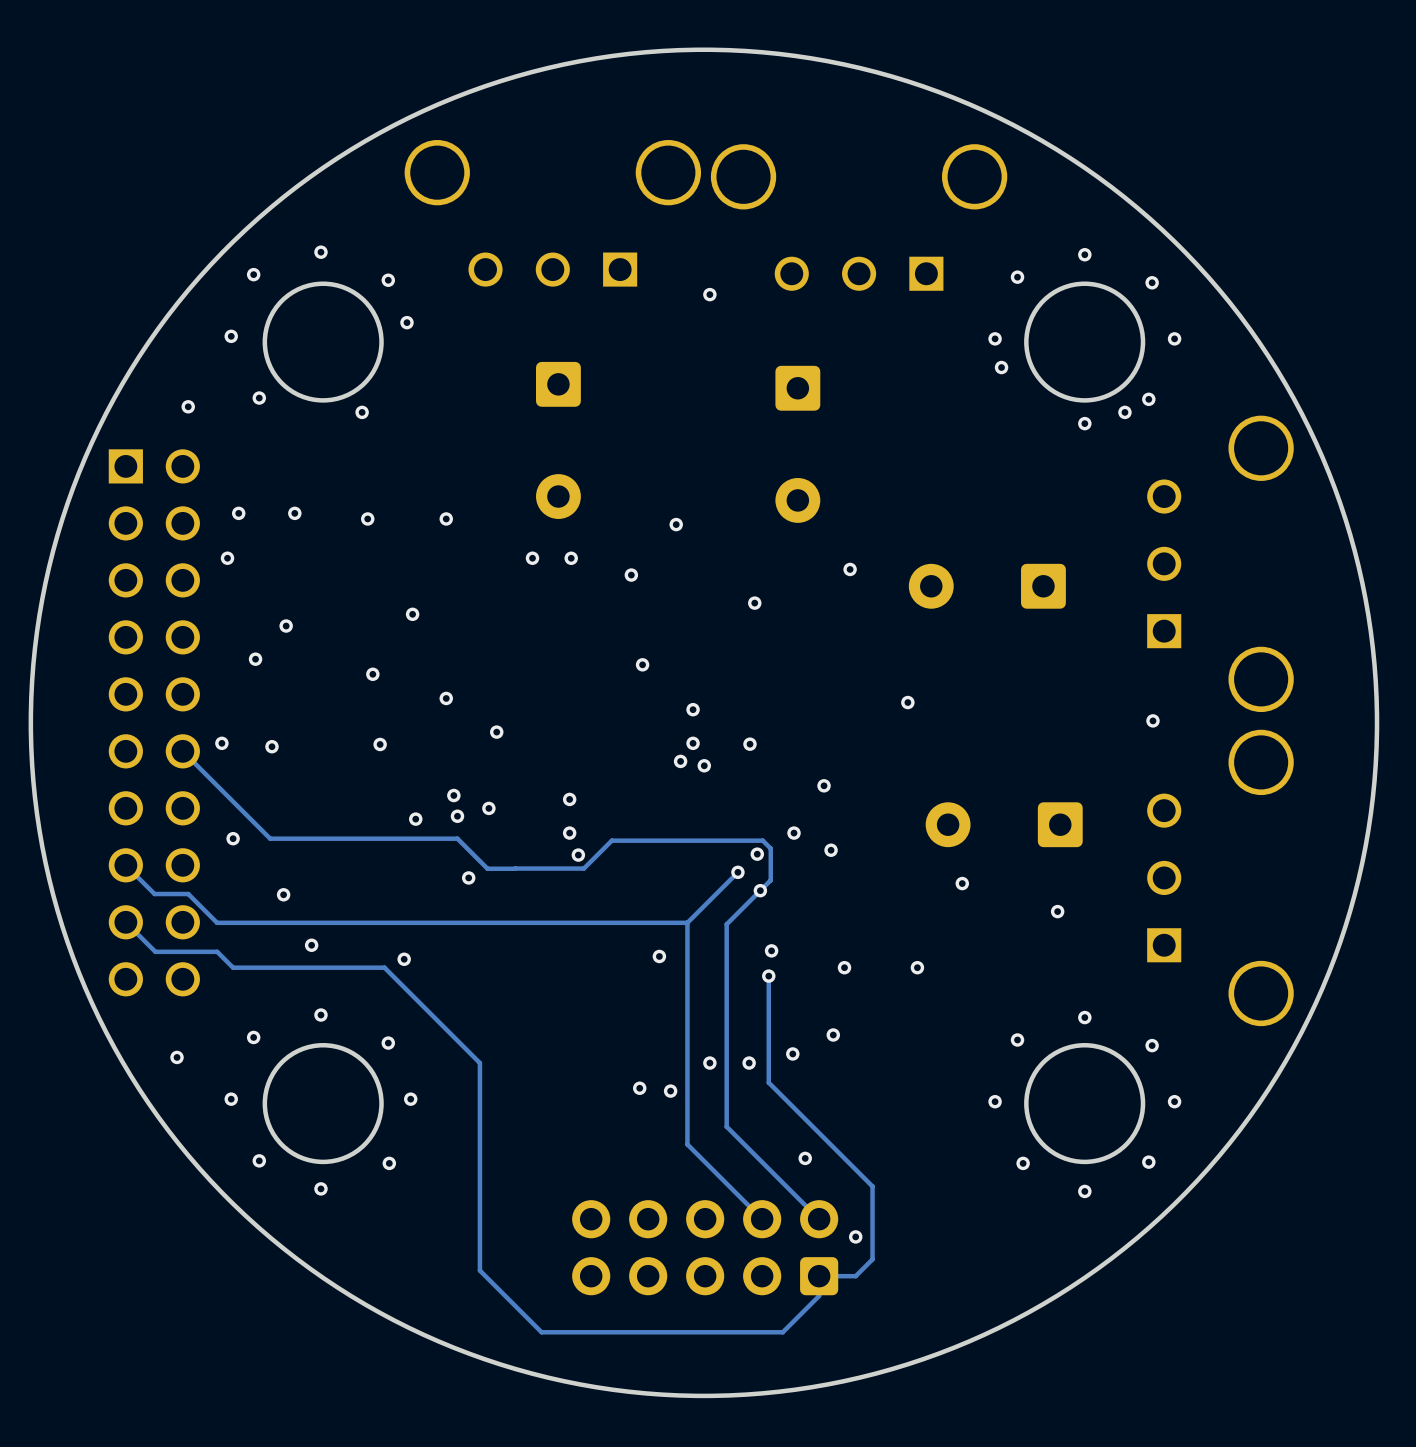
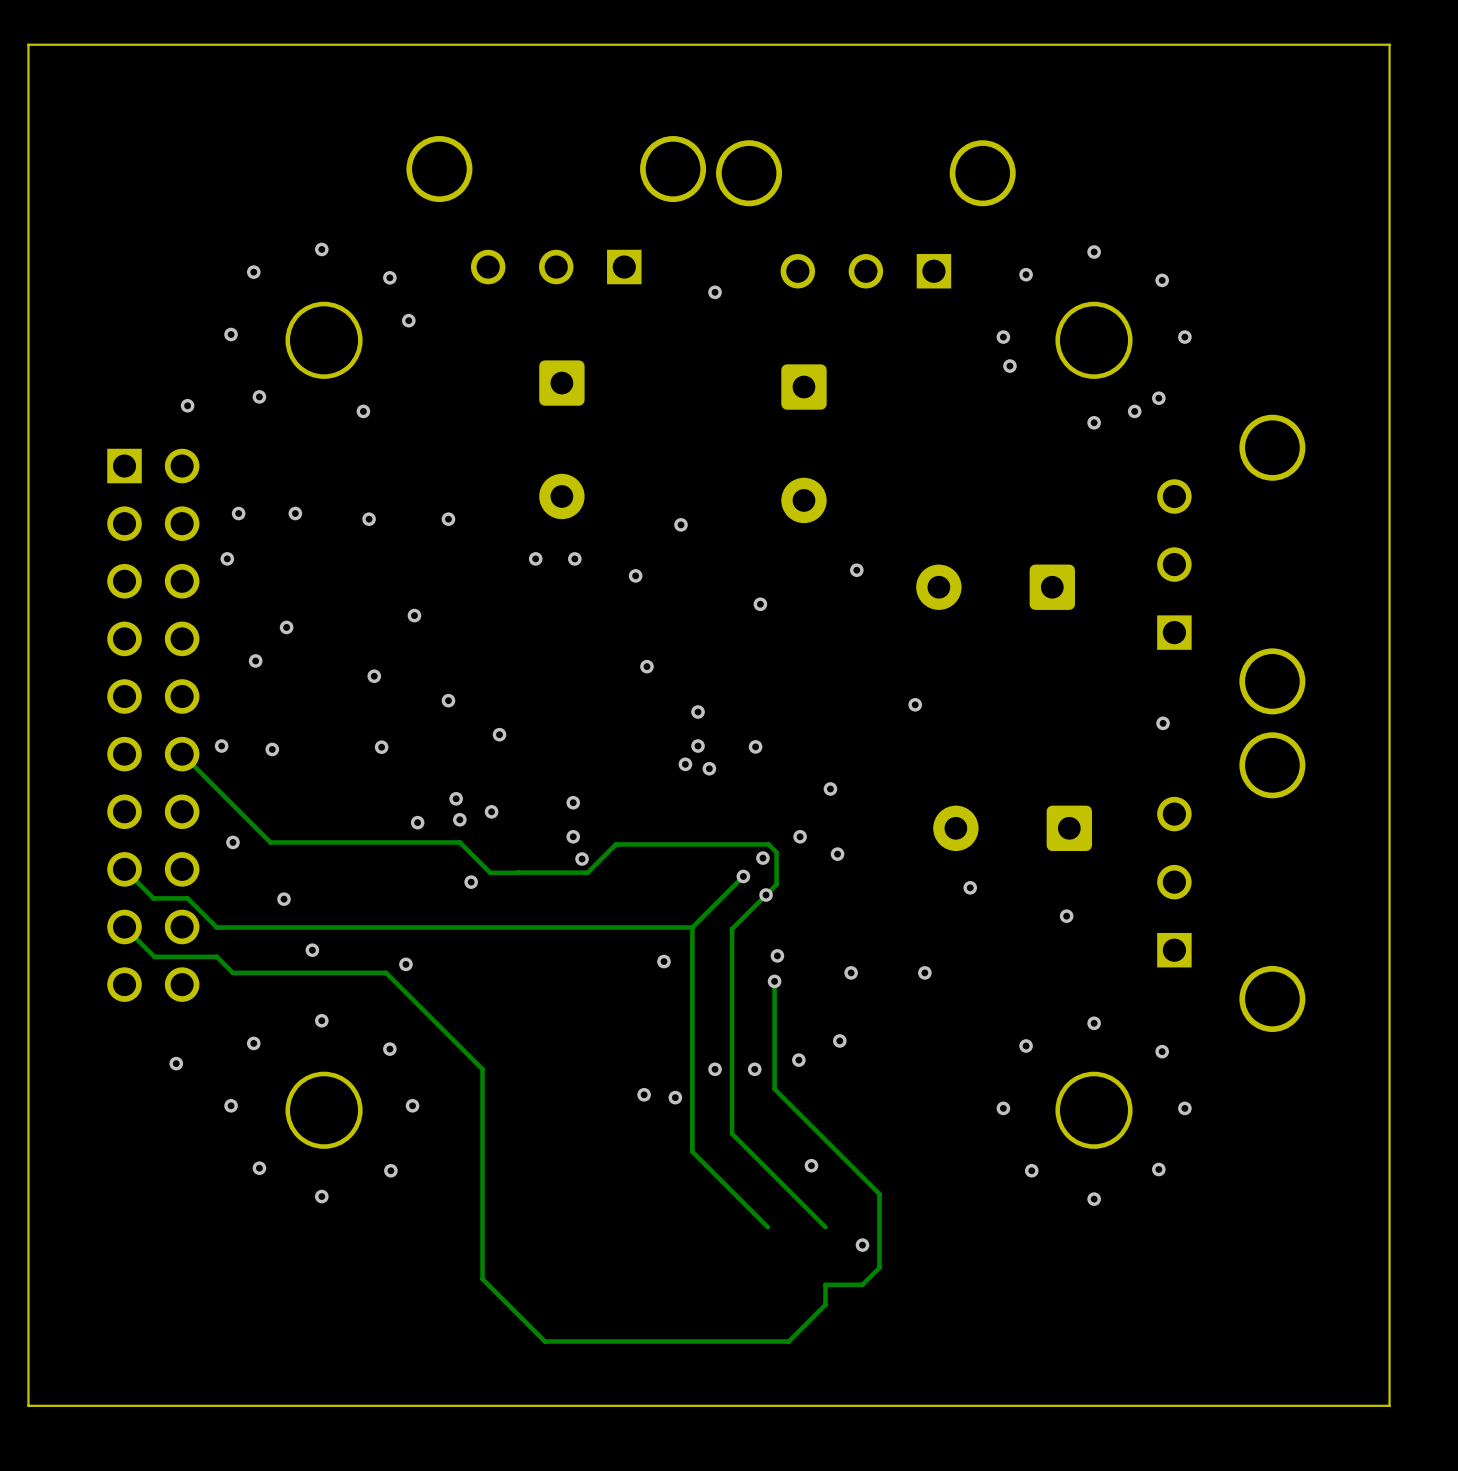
round board edge: [28, 47, 1380, 1399] -> none
board edge: none -> (1389, 44) (28, 44) (28, 1405) (1389, 1405) (1389, 44)
round board edge size: [262, 281, 384, 403] -> [285, 301, 363, 379]
round board edge size: [1024, 281, 1146, 403] -> [1055, 301, 1133, 379]
round board edge size: [262, 1042, 384, 1165] -> [285, 1071, 363, 1149]
round board edge size: [1024, 1042, 1146, 1165] -> [1055, 1071, 1133, 1149]
part: (705, 1247) -> none

